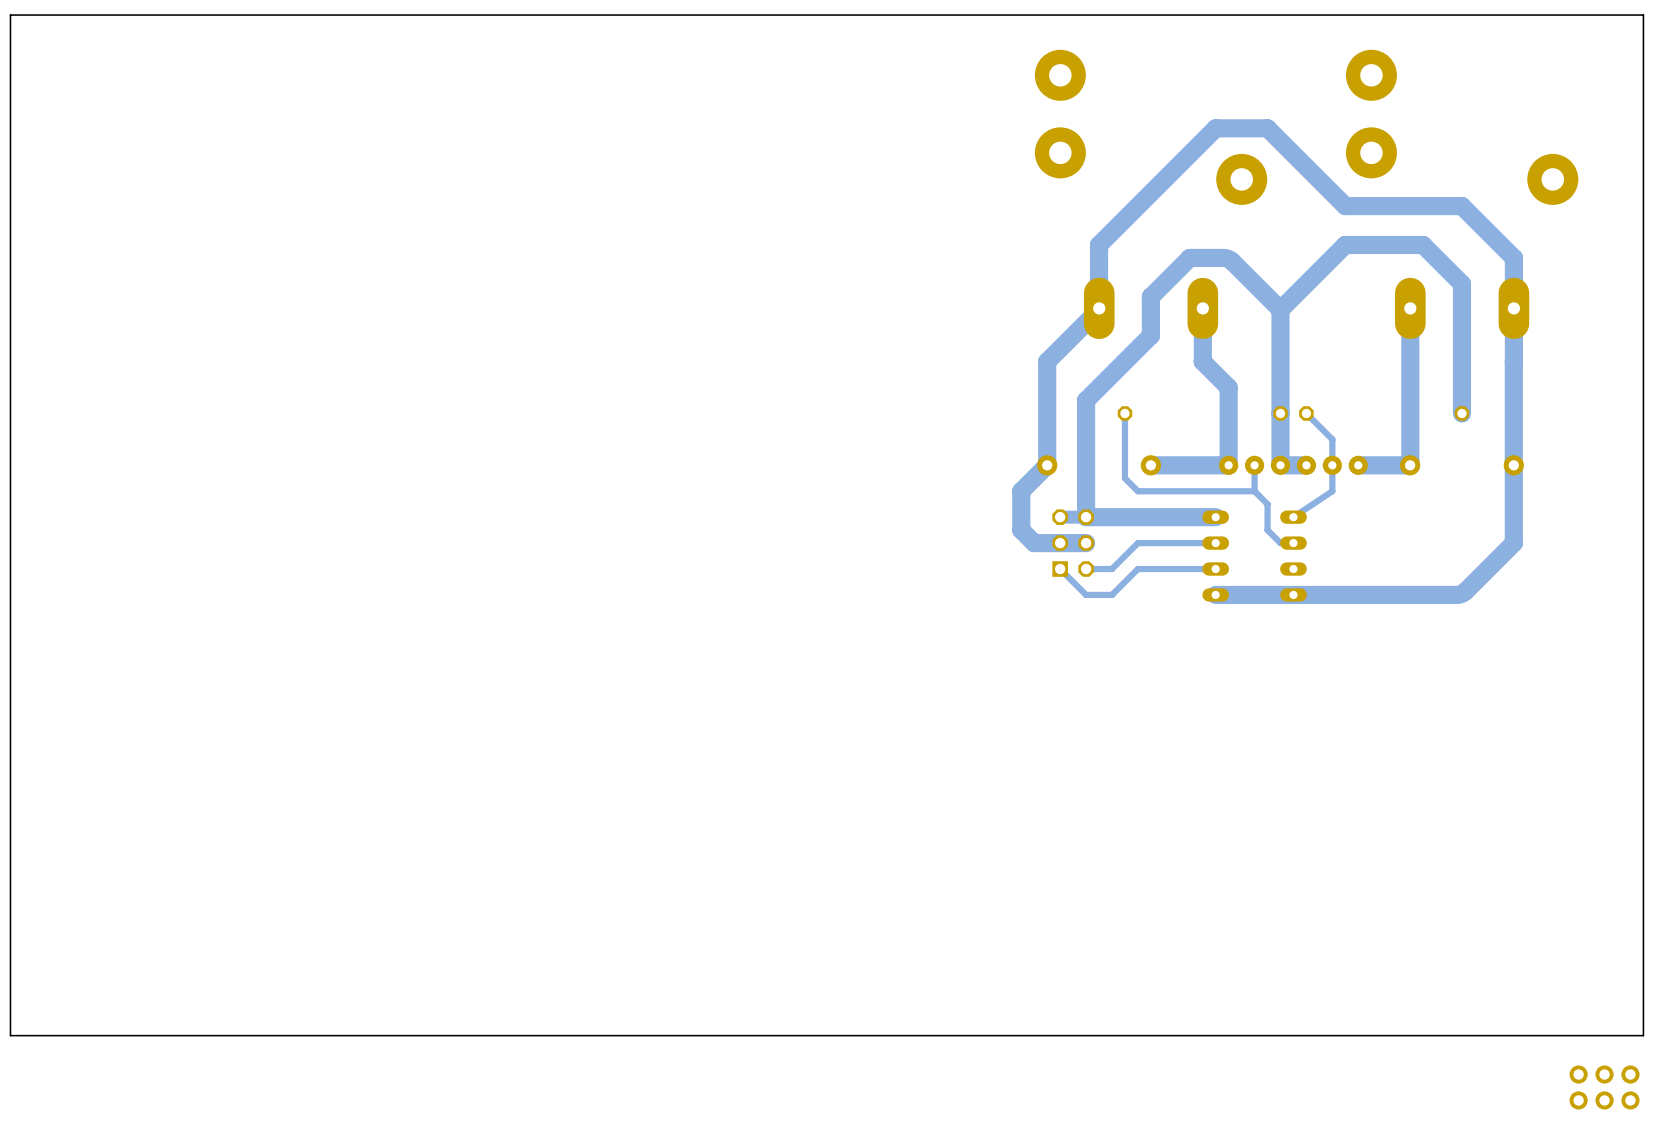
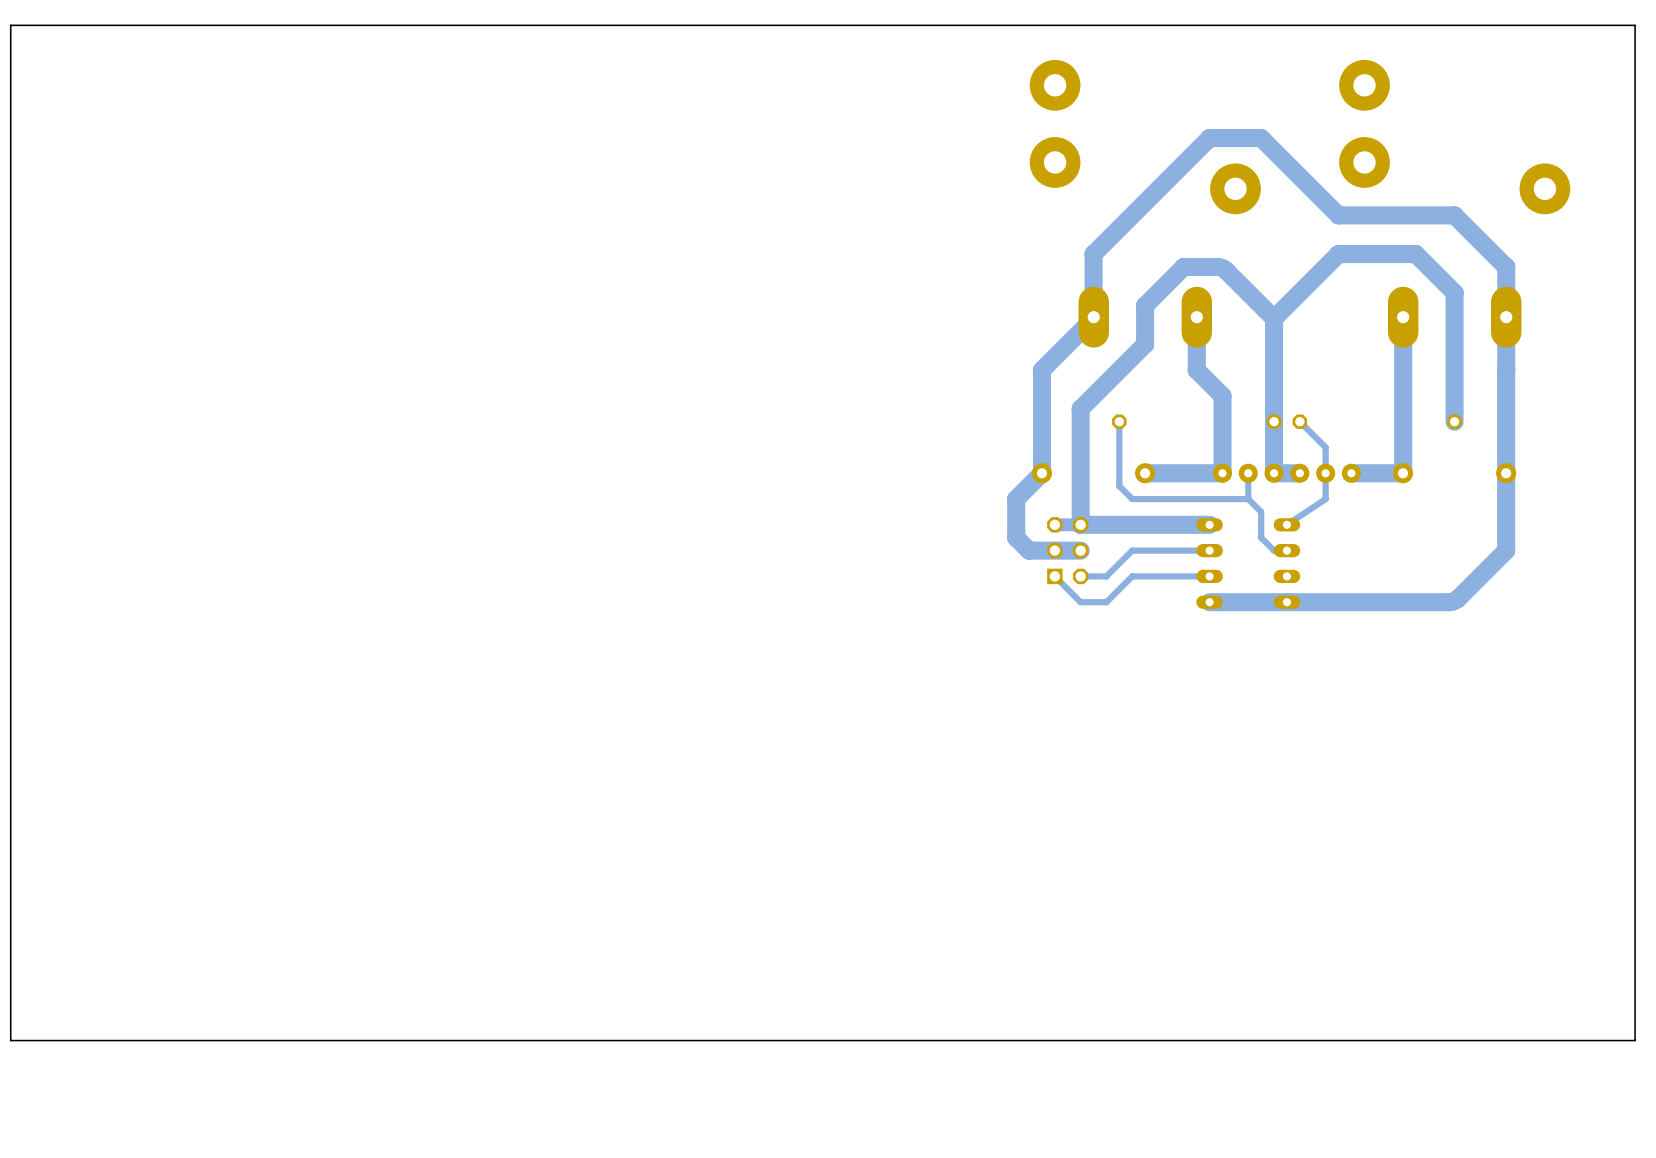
part: (1604, 1074) -> none
part: (1604, 1100) -> none

